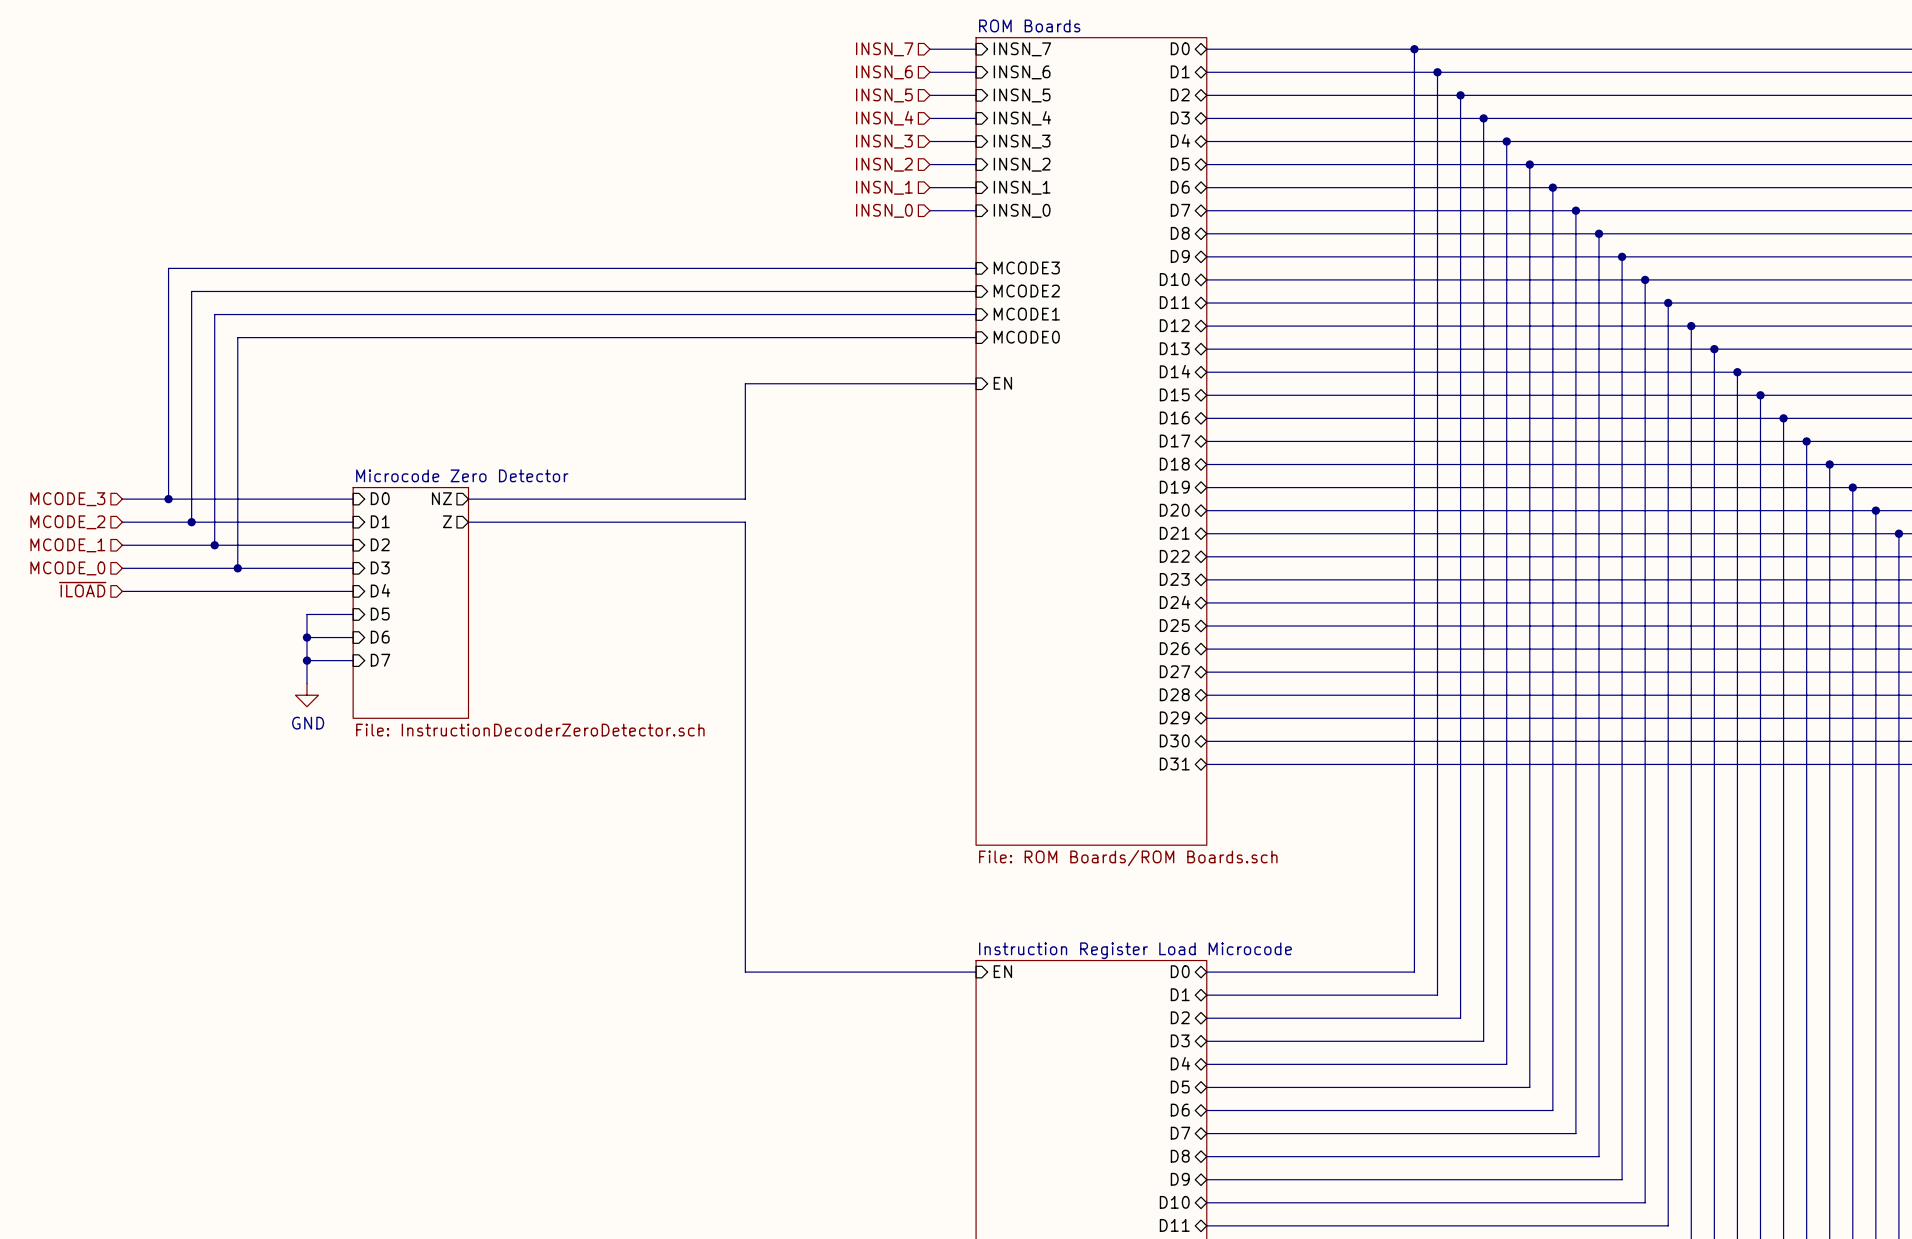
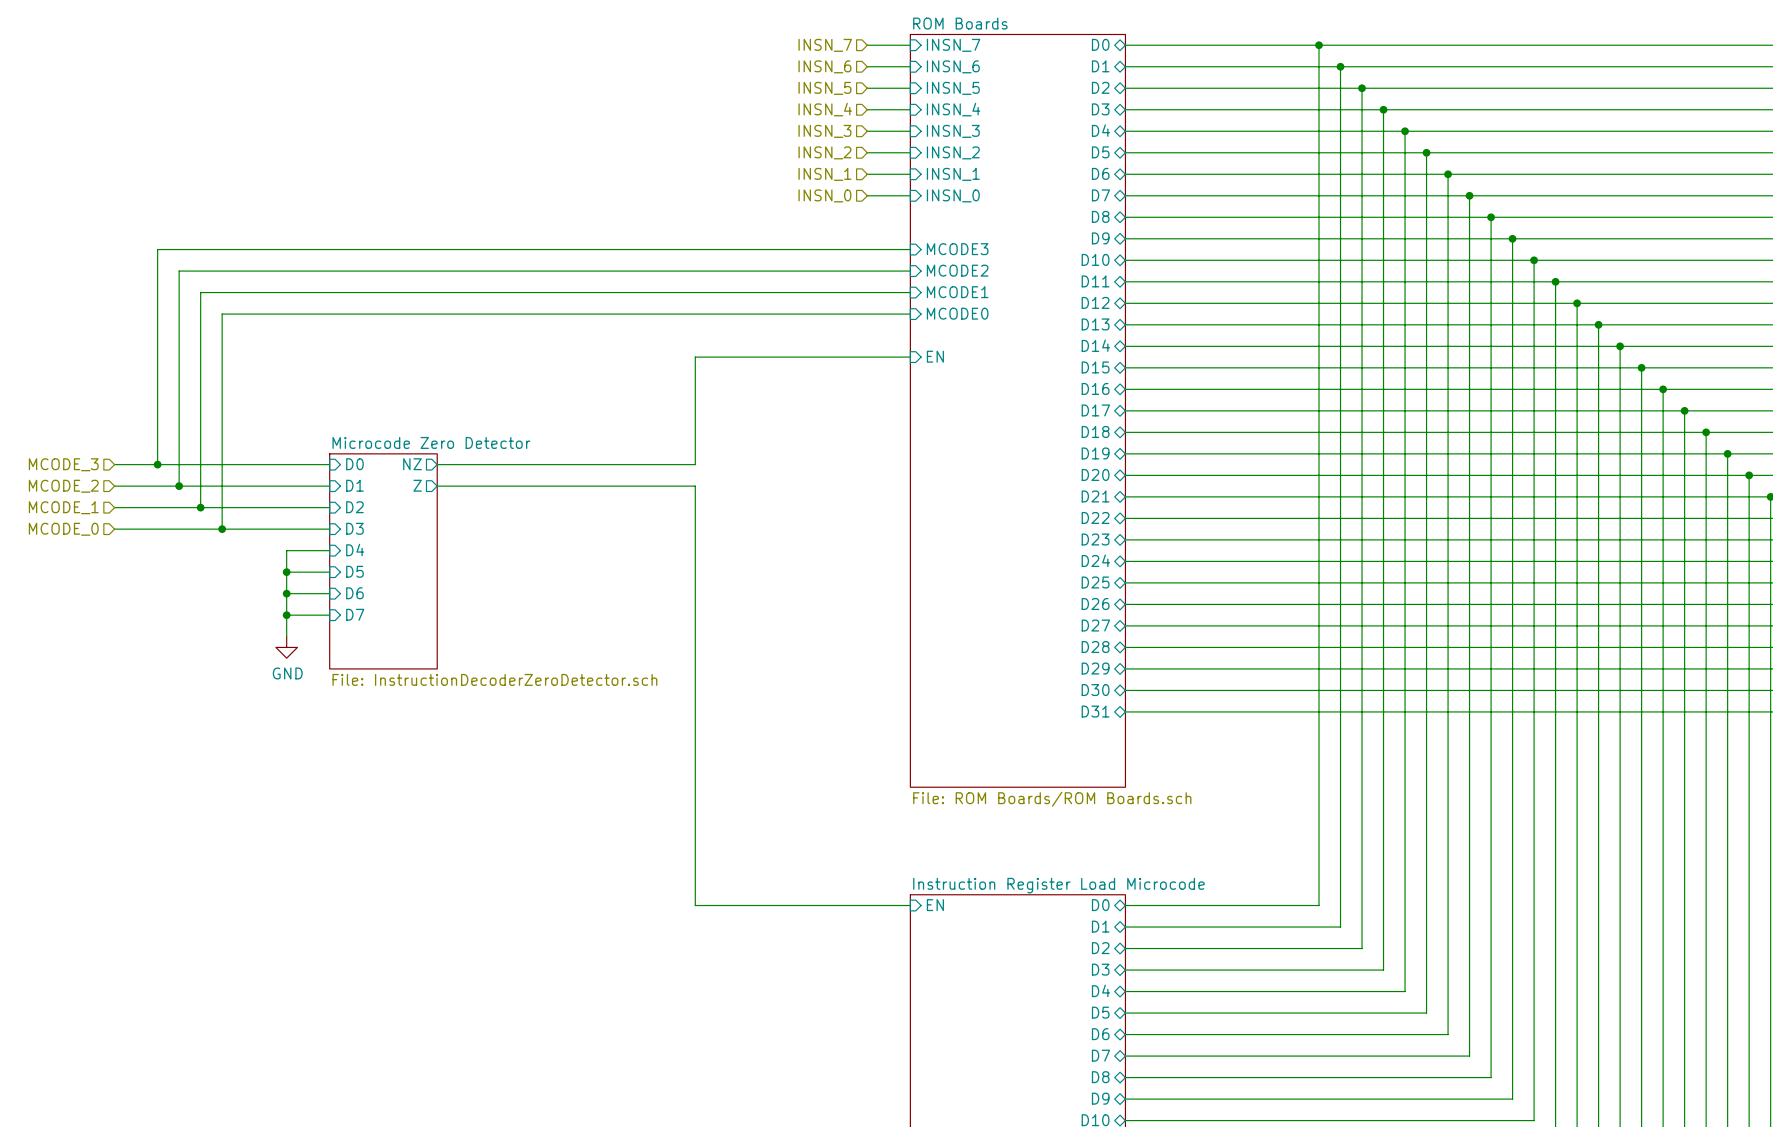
hierarchical label: ~{ILOAD} (82, 589) -> none
wire: (122, 591) (306, 591) -> (286, 572) (286, 550)
junction: none -> (286, 572)

